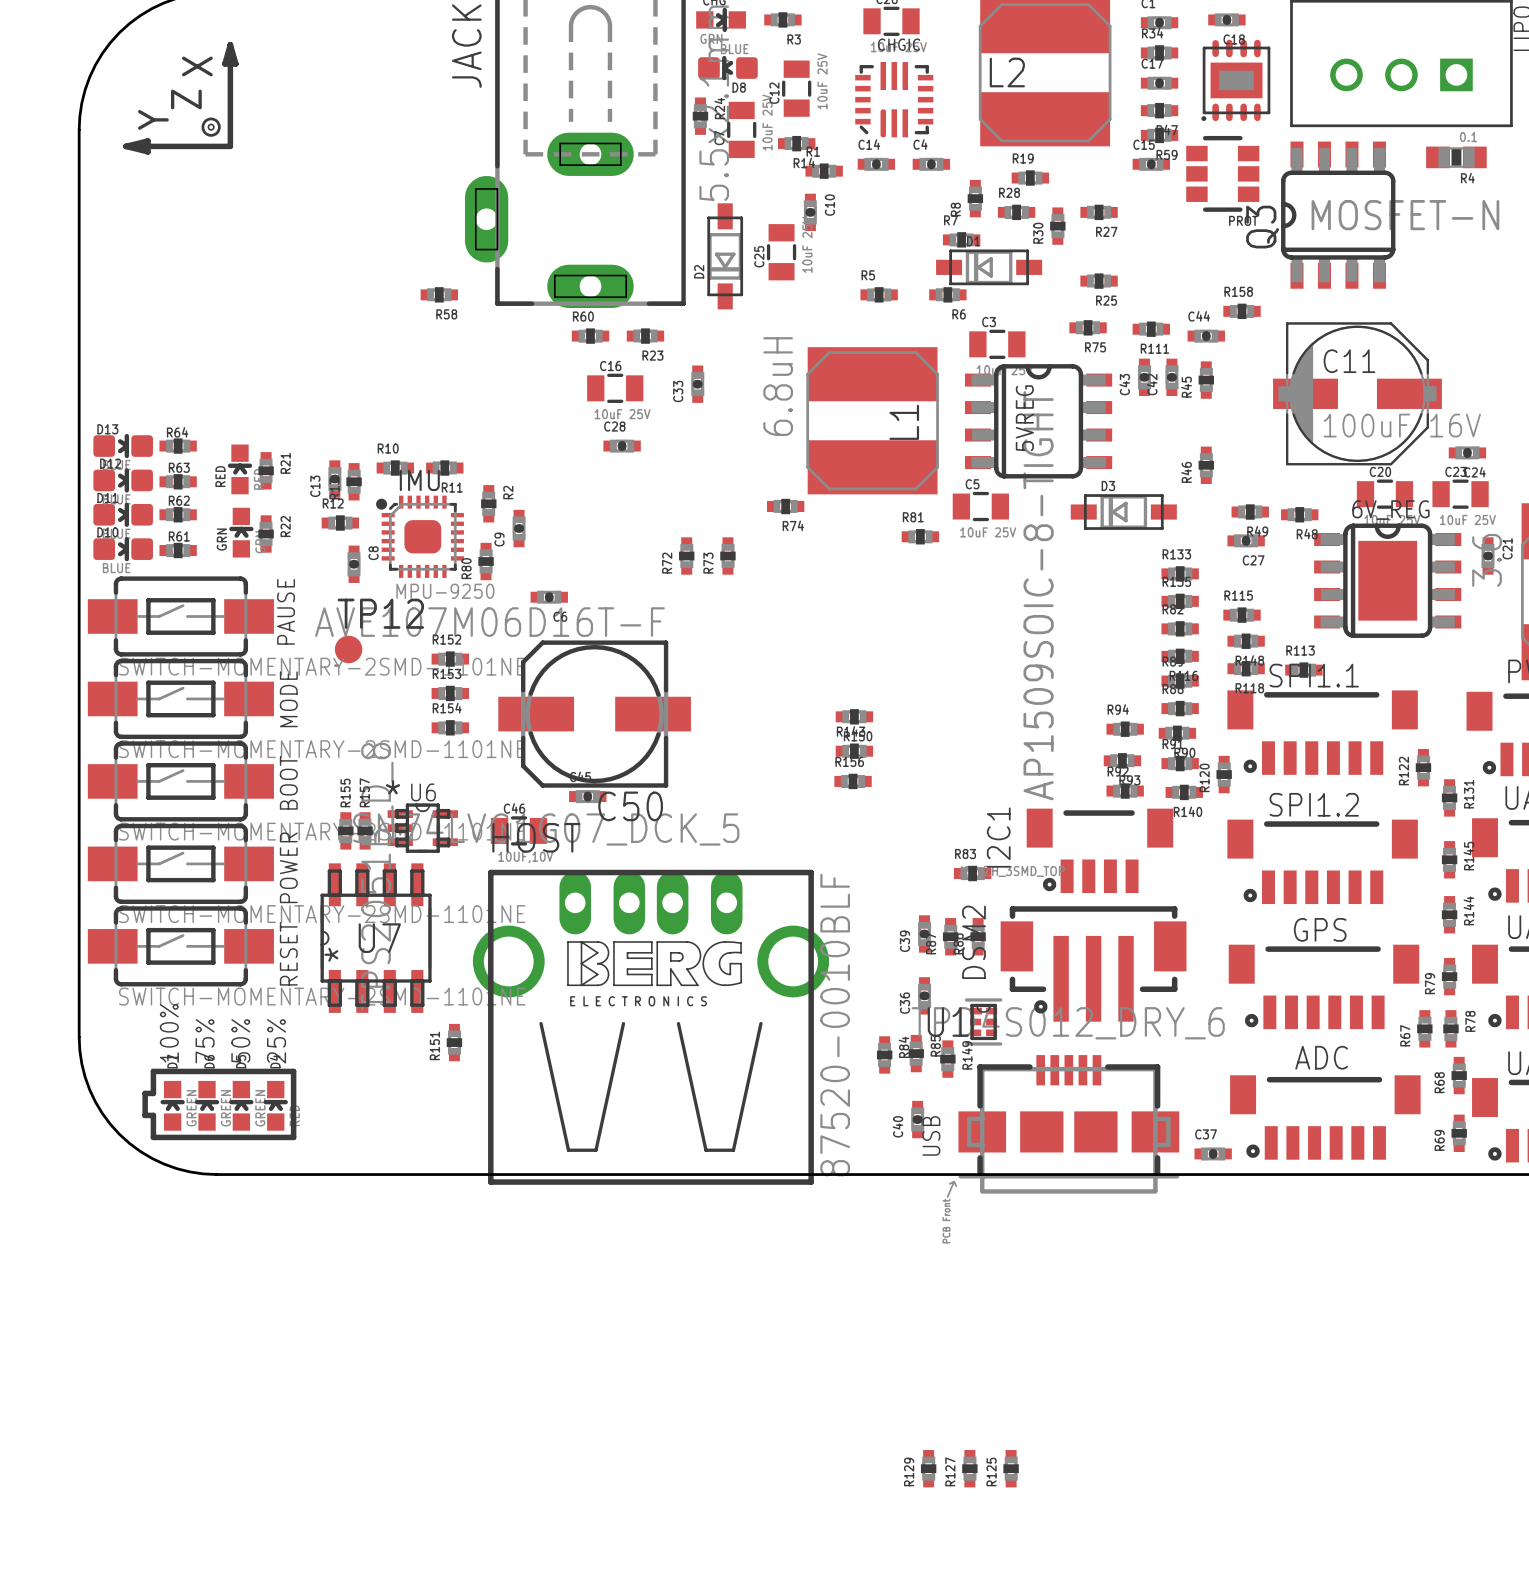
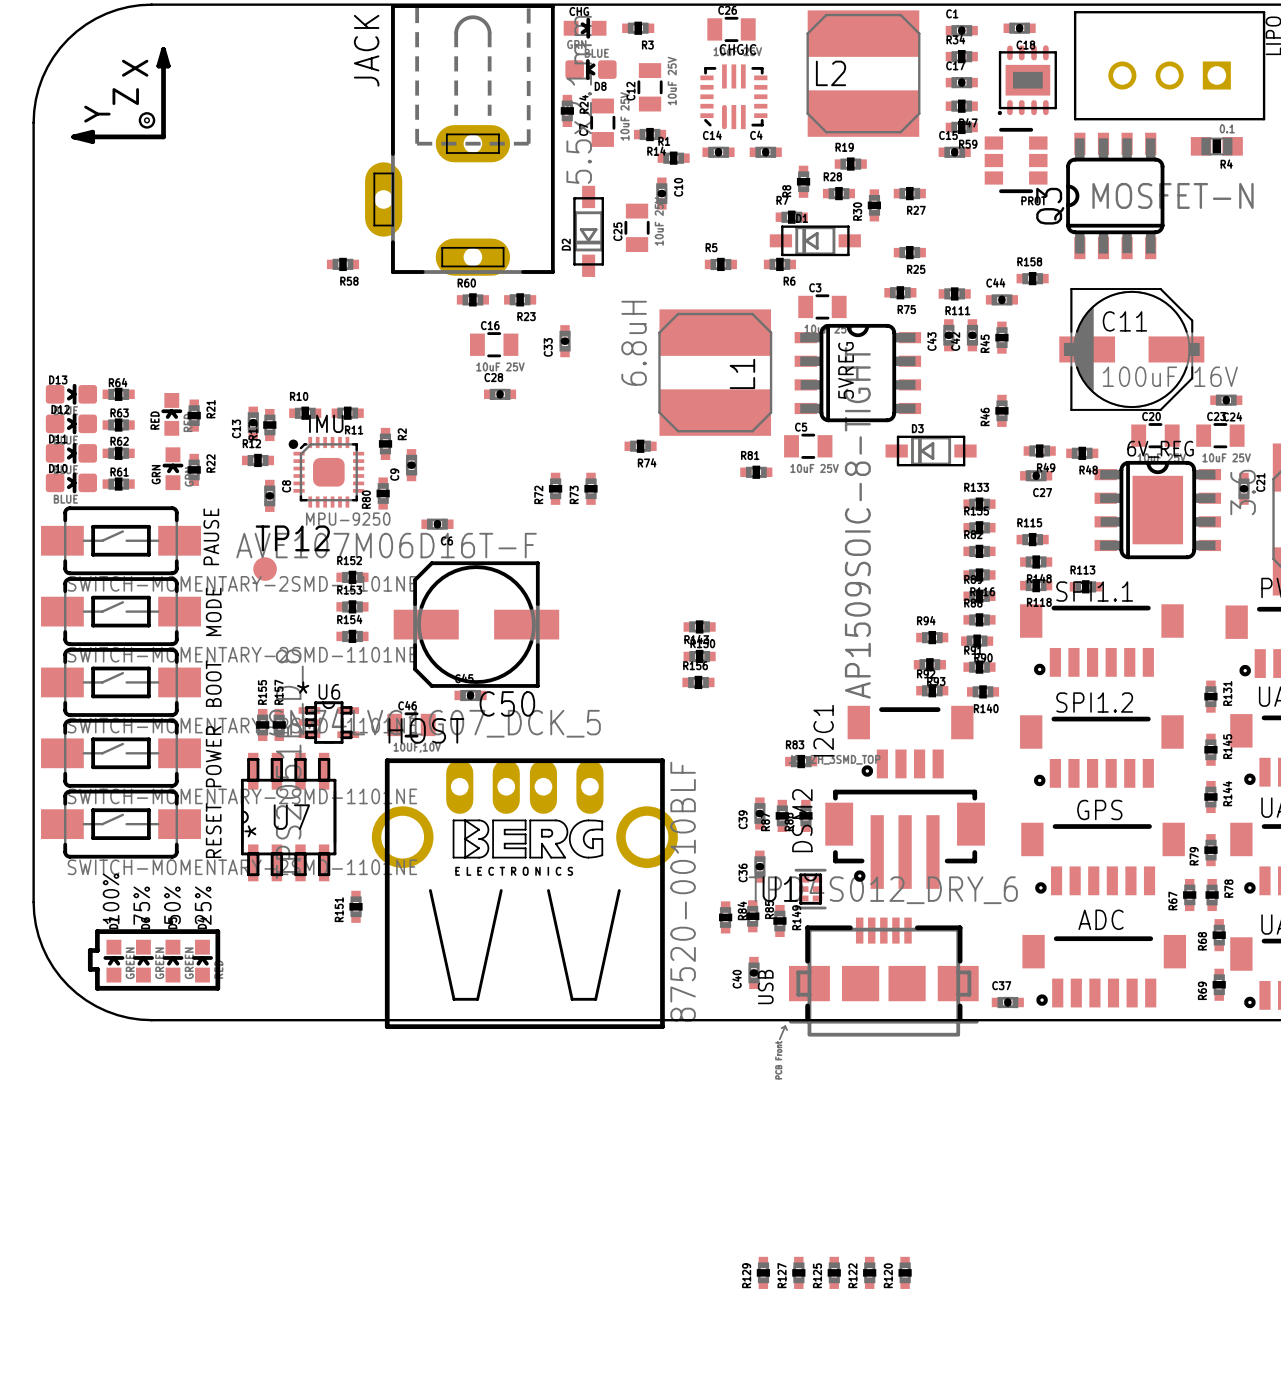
R122 position: (1423, 767) -> (869, 1272)
R120 position: (1224, 774) -> (905, 1272)

